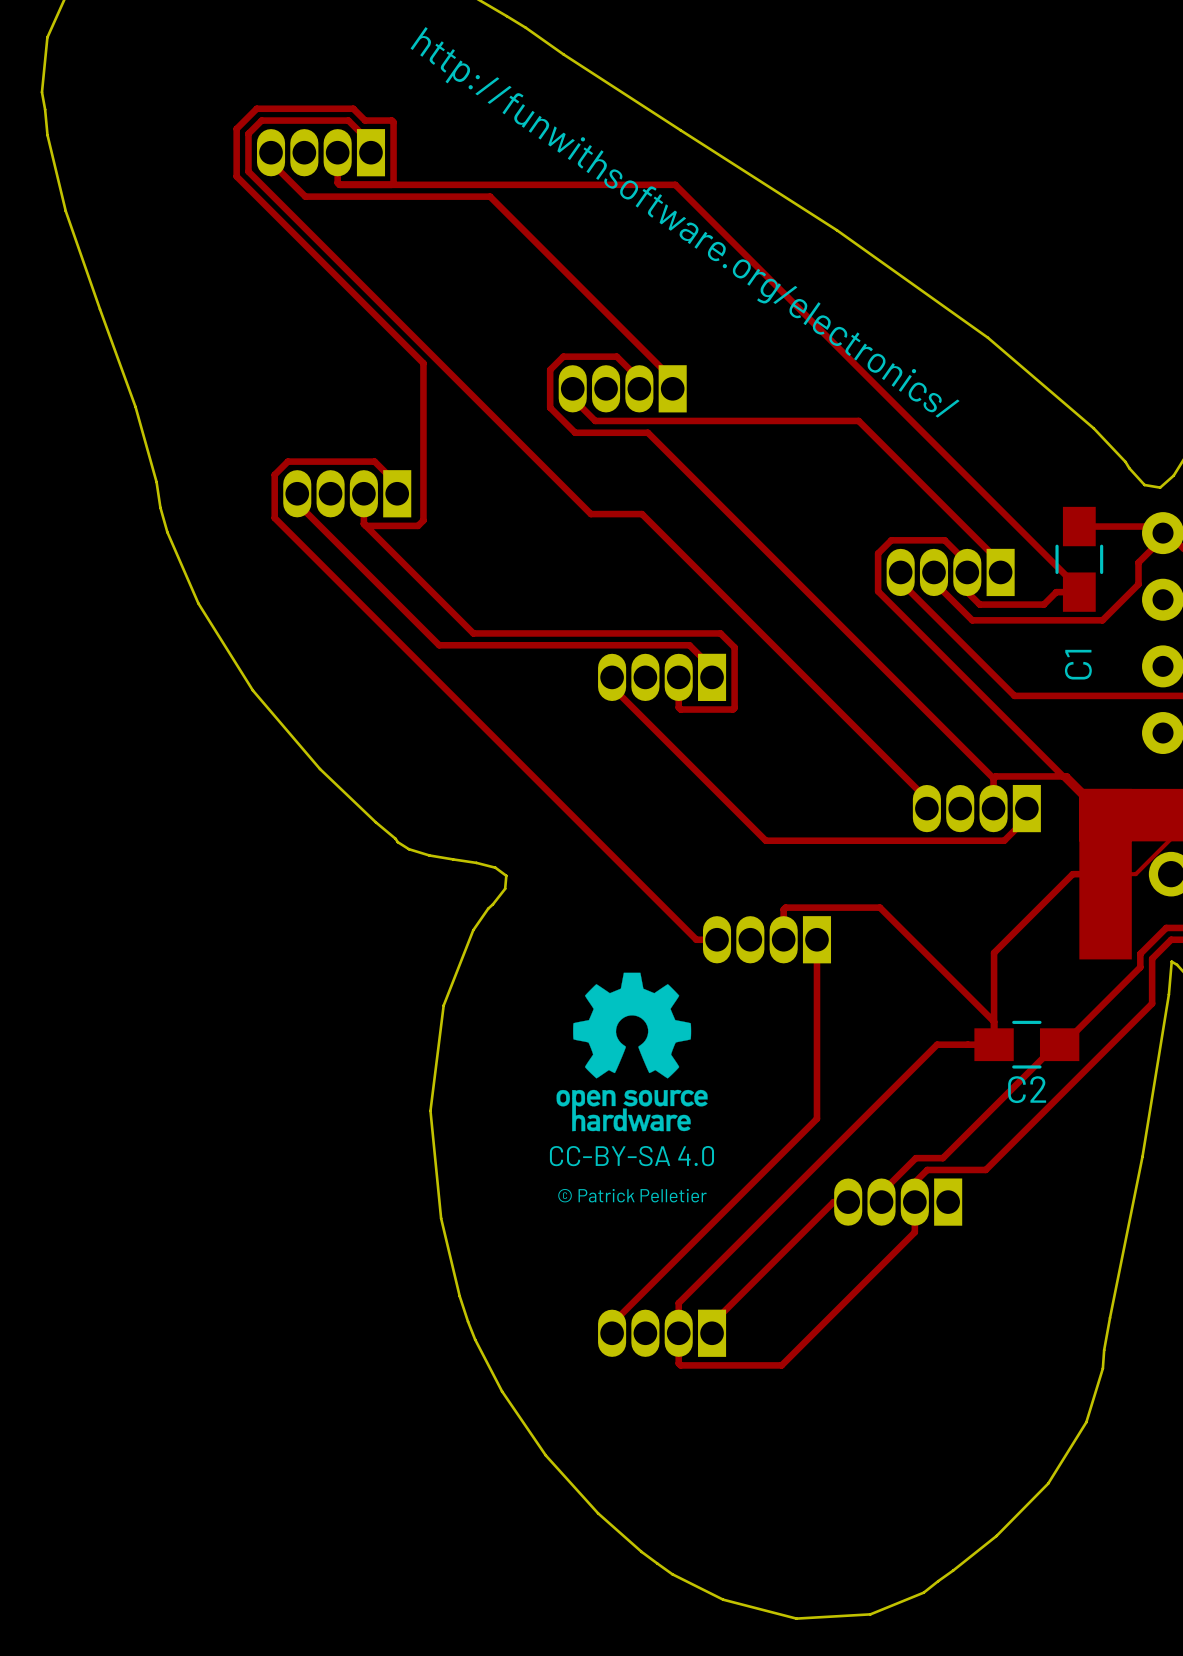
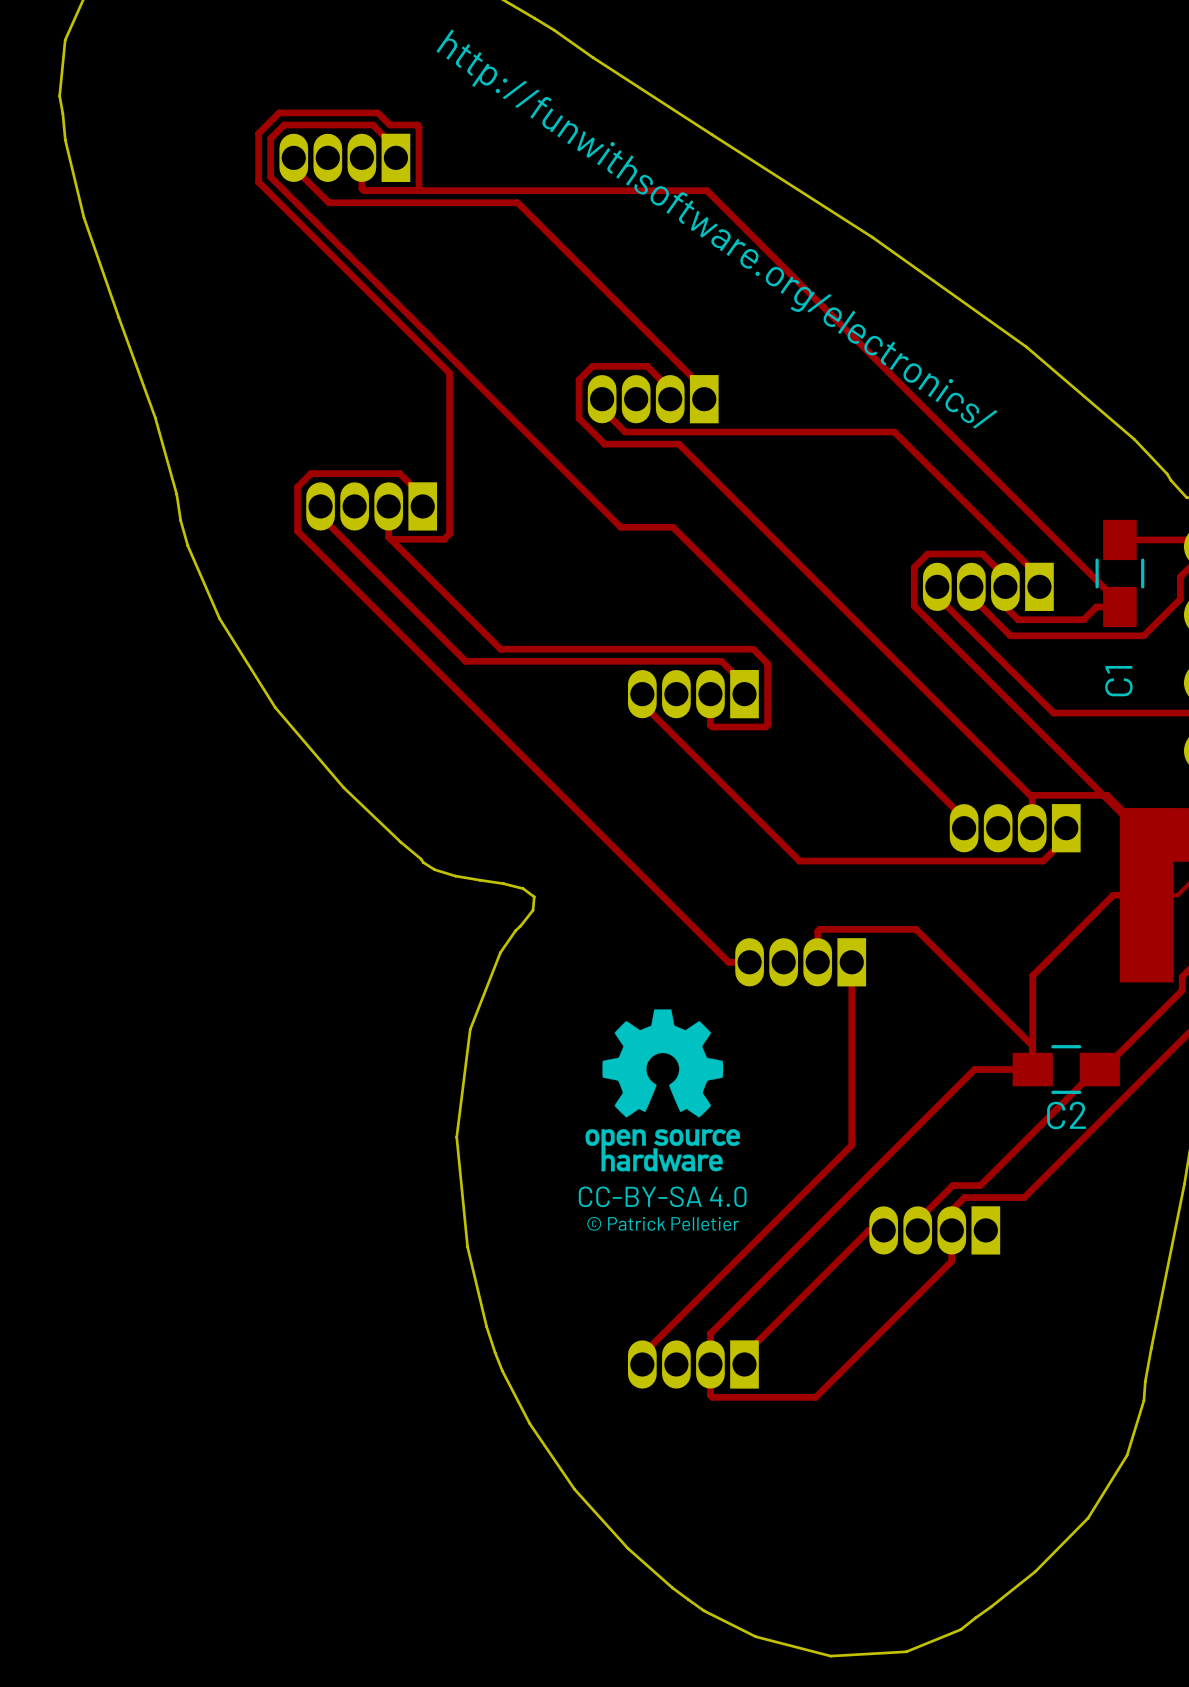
drawing position: (632, 1051) -> (662, 1090)
text position: CC-BY-SA 4.0 (631, 1156) -> CC-BY-SA 4.0 (662, 1196)

